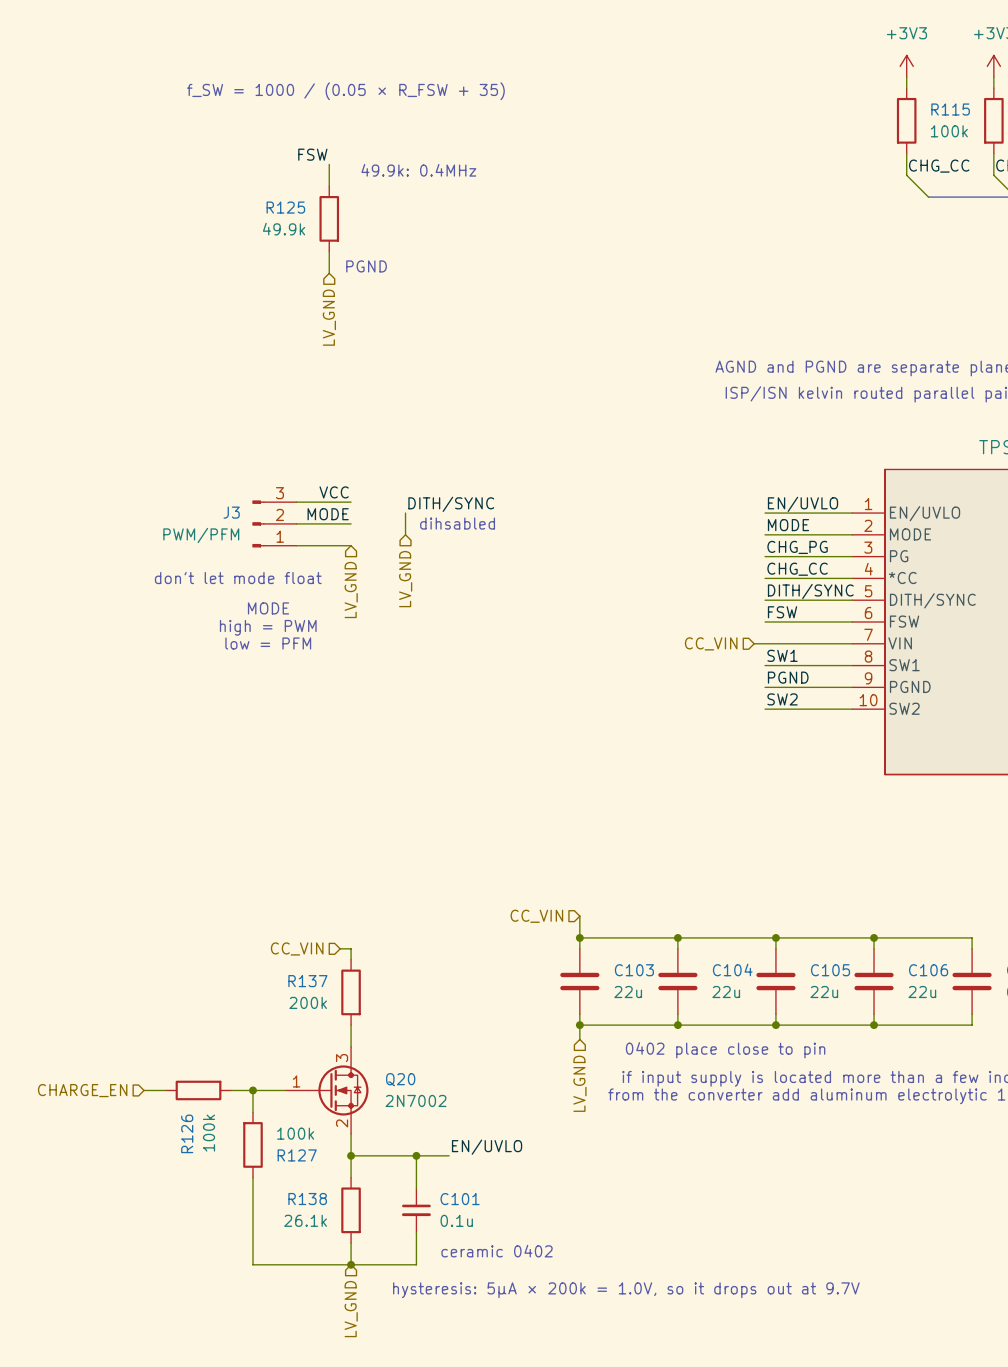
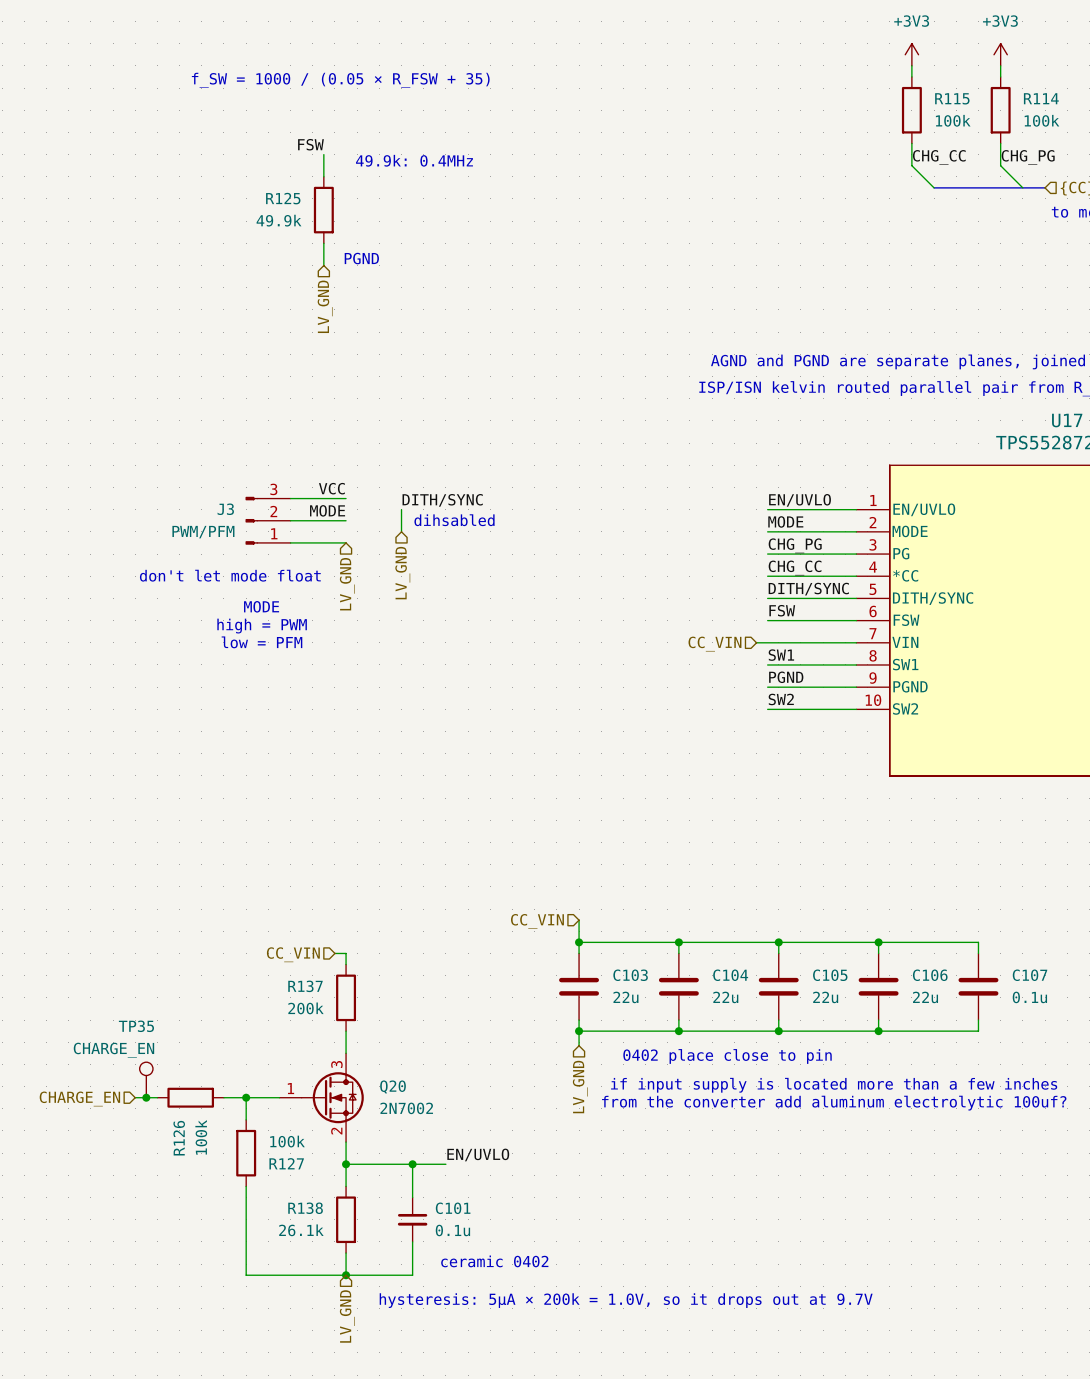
TP35: none -> CHARGE_EN (146, 1079)
junction: none -> (146, 1097)

